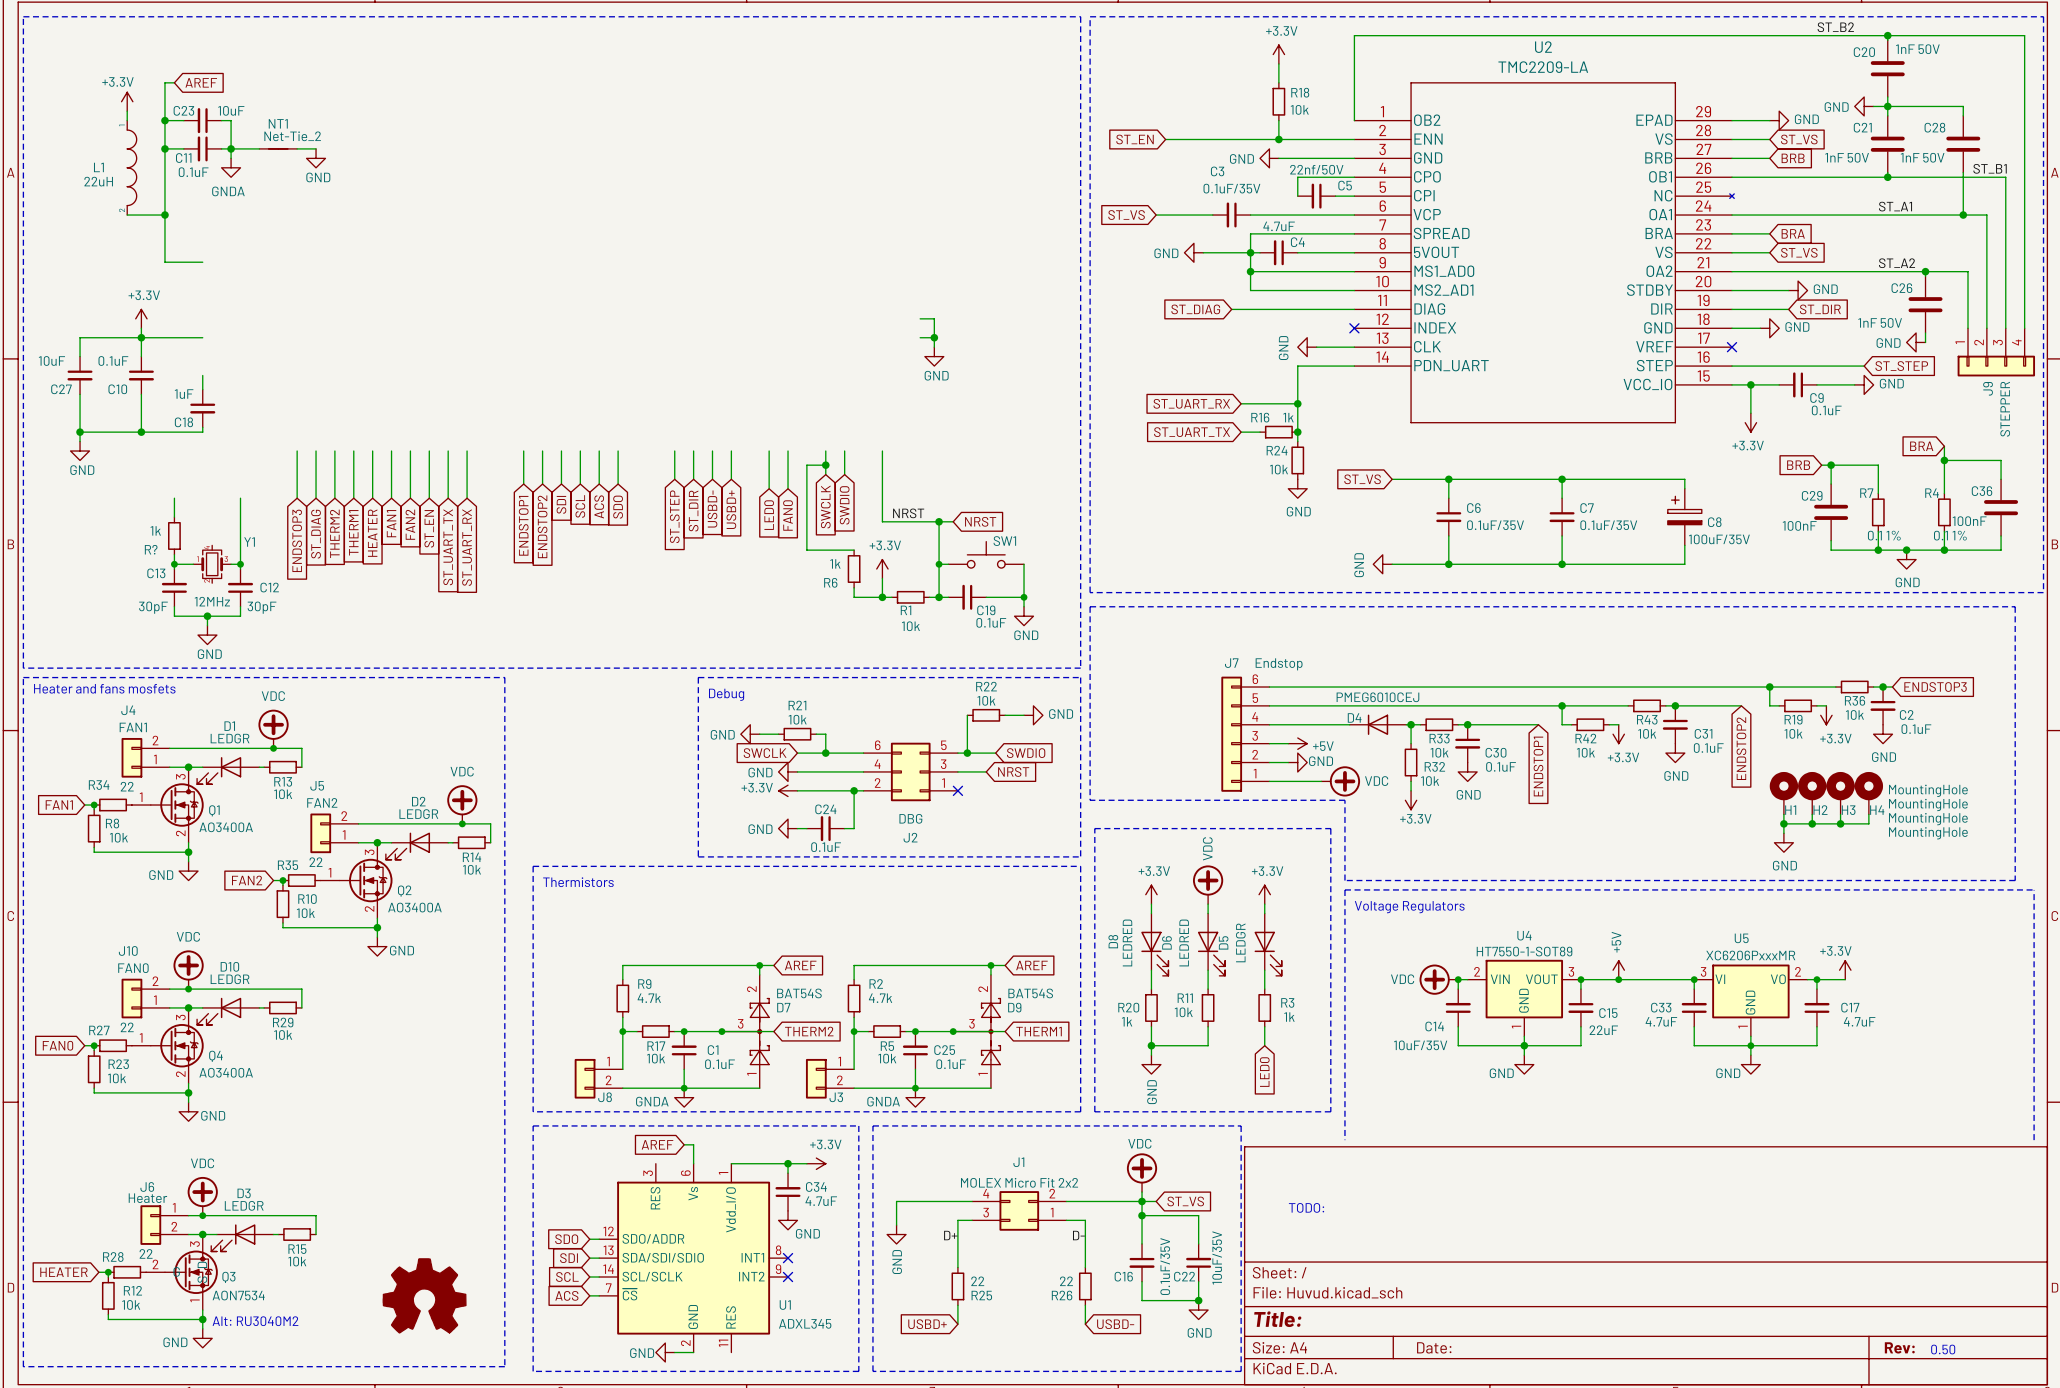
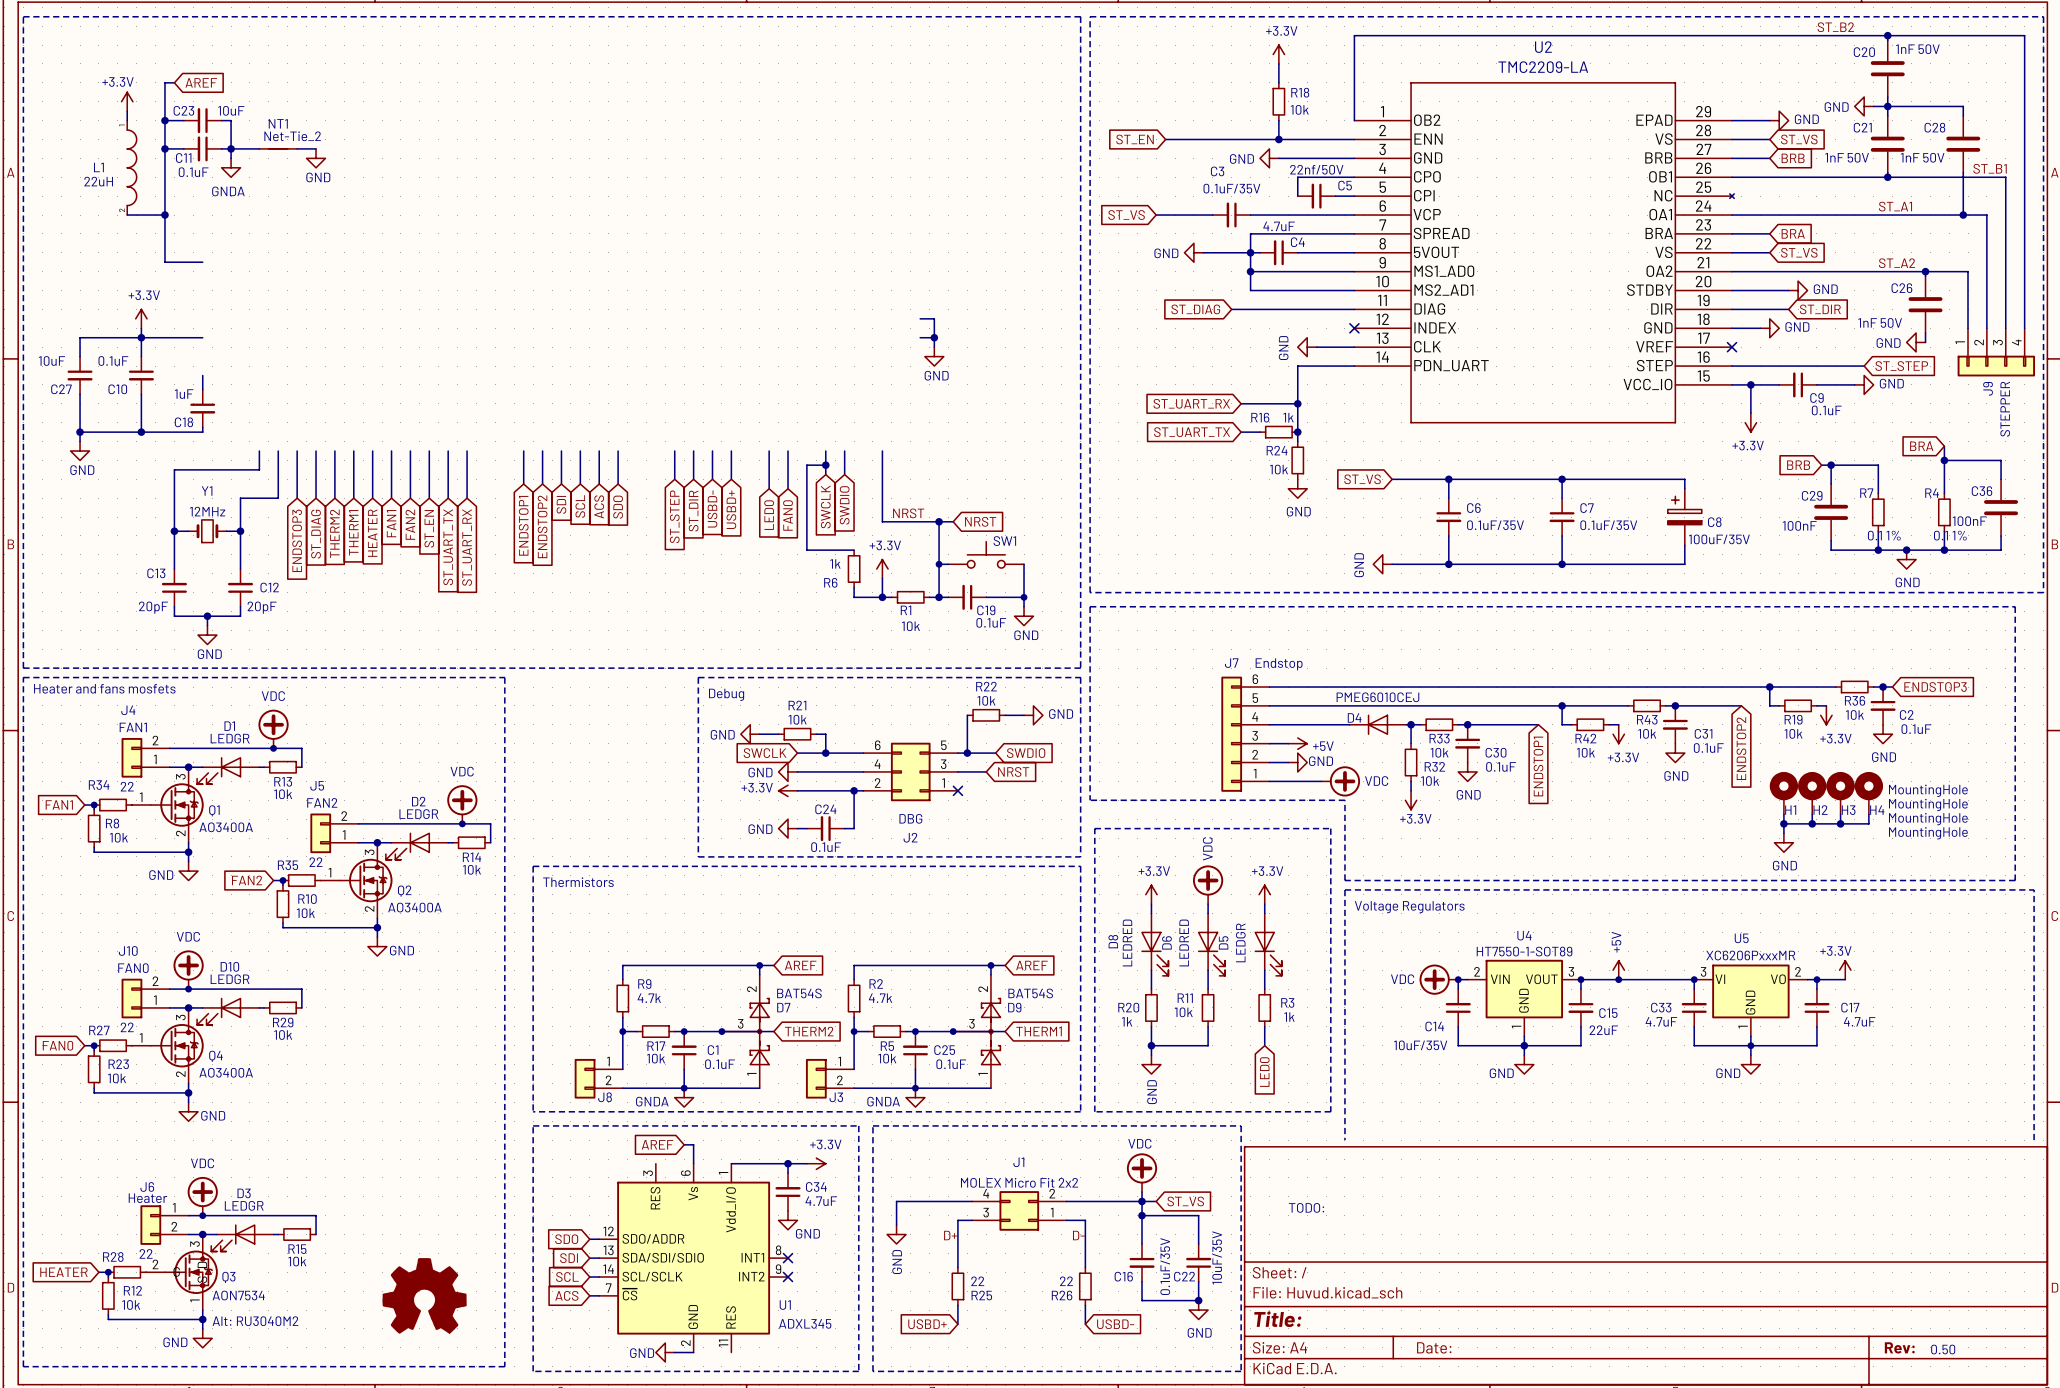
wire: none -> (259, 451) (259, 469) (174, 469) (174, 498)
wire: none -> (278, 451) (278, 498) (240, 498)
wire: none -> (174, 517) (174, 554)
wire: none -> (174, 531) (188, 531)
junction: none -> (174, 531)
wire: none -> (226, 531) (240, 531)
junction: none -> (240, 531)
R?: 1k (174, 535) -> none
Y1 name position: Y1 (249, 542) -> Y1 (207, 491)
Y1 symbol: [193, 545, 232, 584] -> [188, 519, 227, 543]
wire: (174, 564) (193, 564) -> none
junction: (174, 564) -> none
wire: (231, 564) (240, 564) -> none
junction: (240, 564) -> none
Y1 value position: 12MHz (212, 601) -> 12MHz (207, 511)
C13 value: 30pF (153, 607) -> 20pF (153, 607)
C12 value: 30pF (262, 607) -> 20pF (262, 607)

